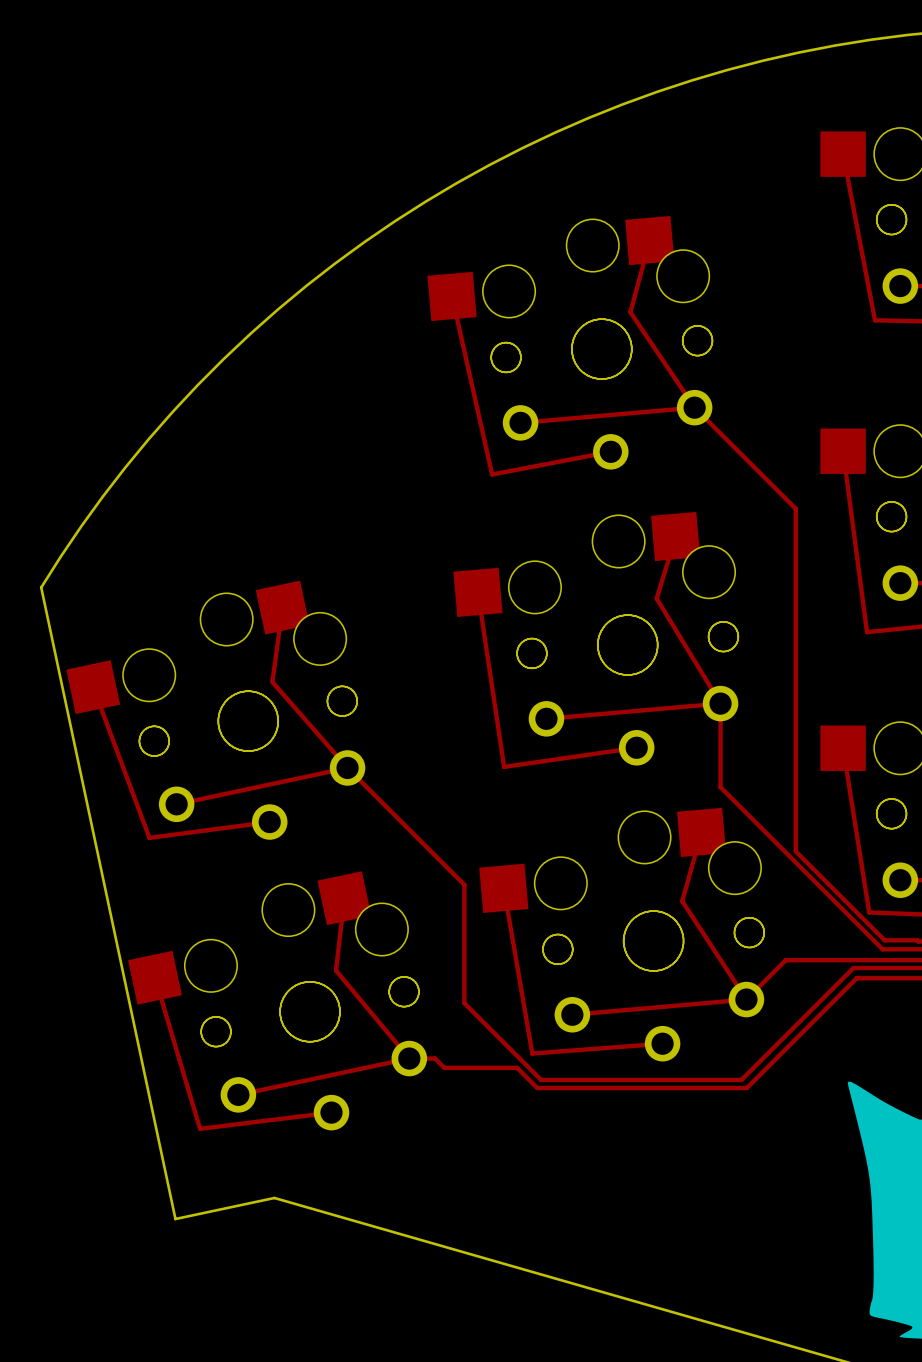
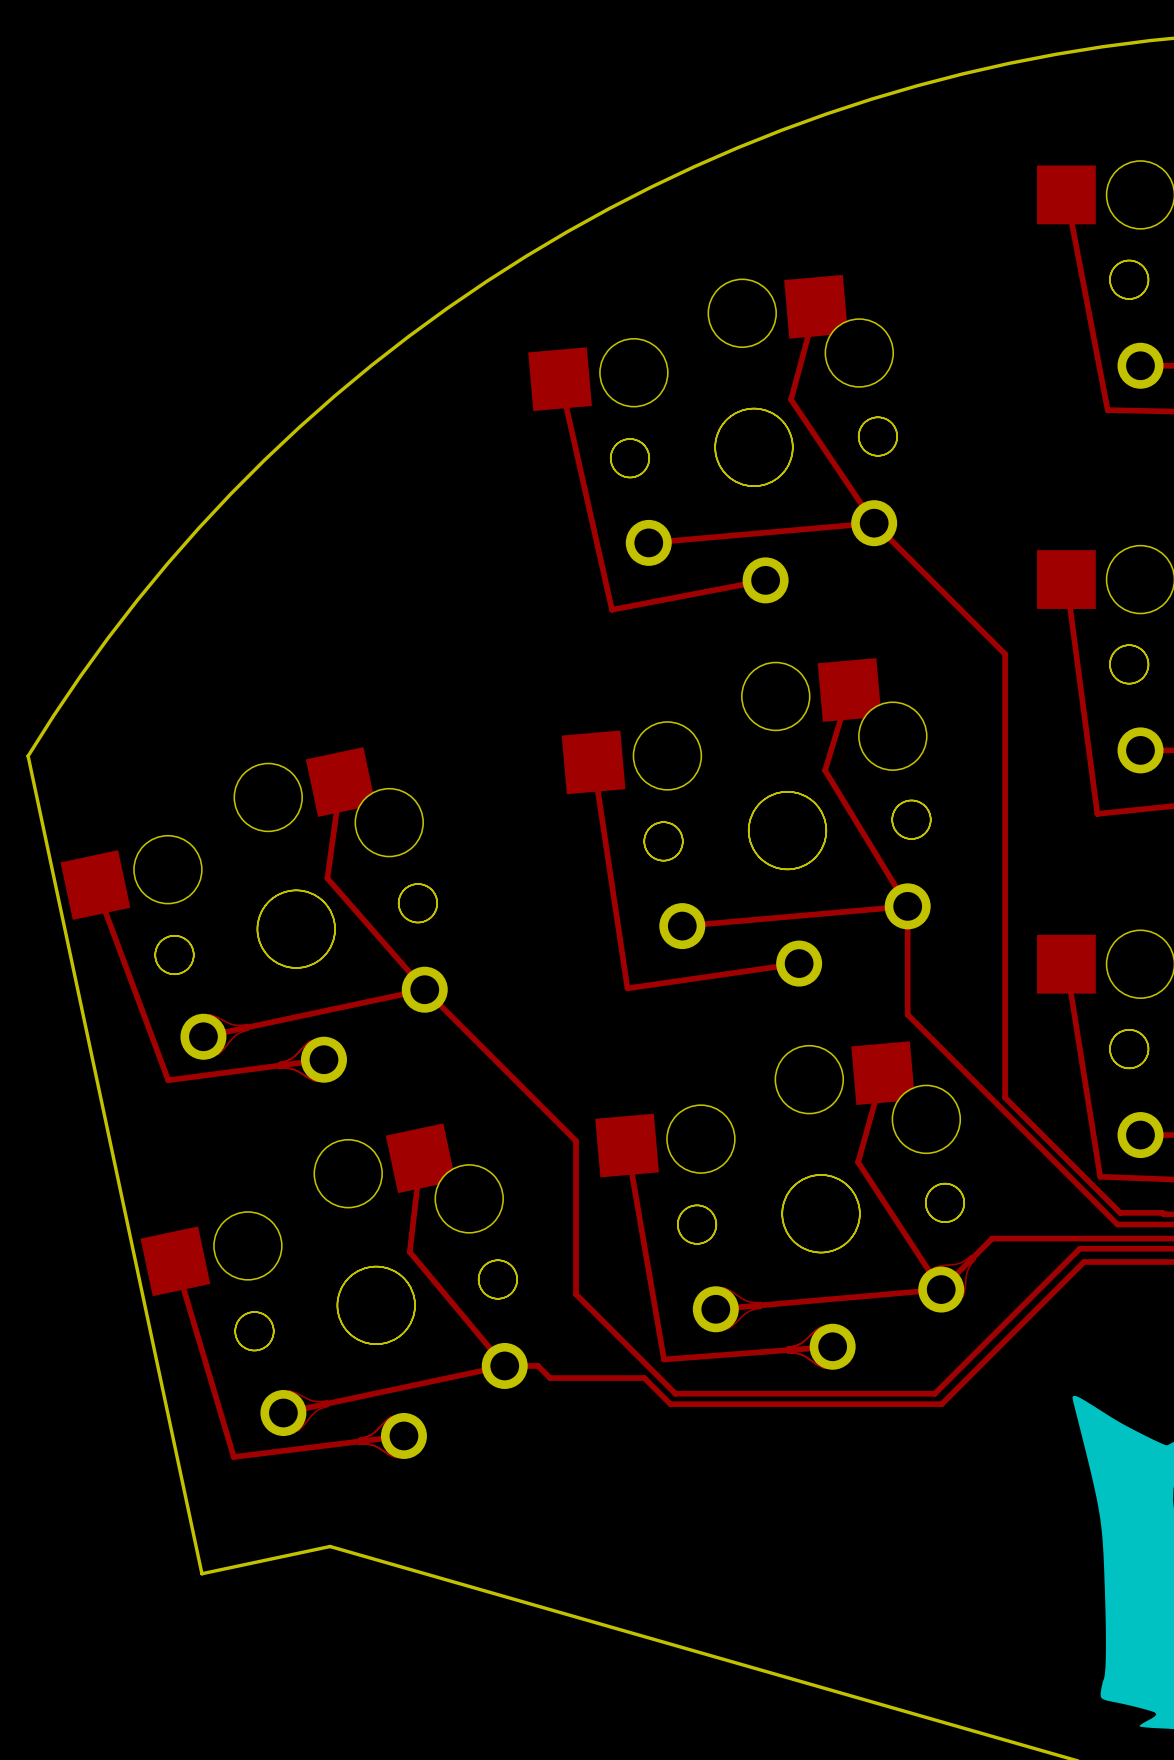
zone outline: none -> (208, 1014) (233, 1024) (247, 1024) (248, 1030) (236, 1035) (217, 1054) (192, 1039) (208, 1014)
zone outline: none -> (311, 1040) (335, 1058) (316, 1081) (292, 1069) (278, 1068) (278, 1062) (291, 1058) (311, 1040)
zone outline: none -> (971, 1255) (960, 1263) (933, 1267) (933, 1297) (962, 1297) (967, 1270) (975, 1259) (971, 1255)
zone outline: none -> (724, 1287) (747, 1301) (761, 1302) (761, 1308) (748, 1311) (727, 1329) (704, 1310) (724, 1287)
zone outline: none -> (821, 1326) (844, 1345) (824, 1368) (800, 1354) (787, 1353) (786, 1347) (800, 1343) (821, 1326)
zone outline: none -> (288, 1390) (313, 1401) (327, 1400) (328, 1406) (316, 1411) (297, 1431) (272, 1415) (288, 1390)
zone outline: none -> (391, 1416) (415, 1434) (396, 1457) (372, 1445) (358, 1444) (358, 1438) (371, 1434) (391, 1416)

